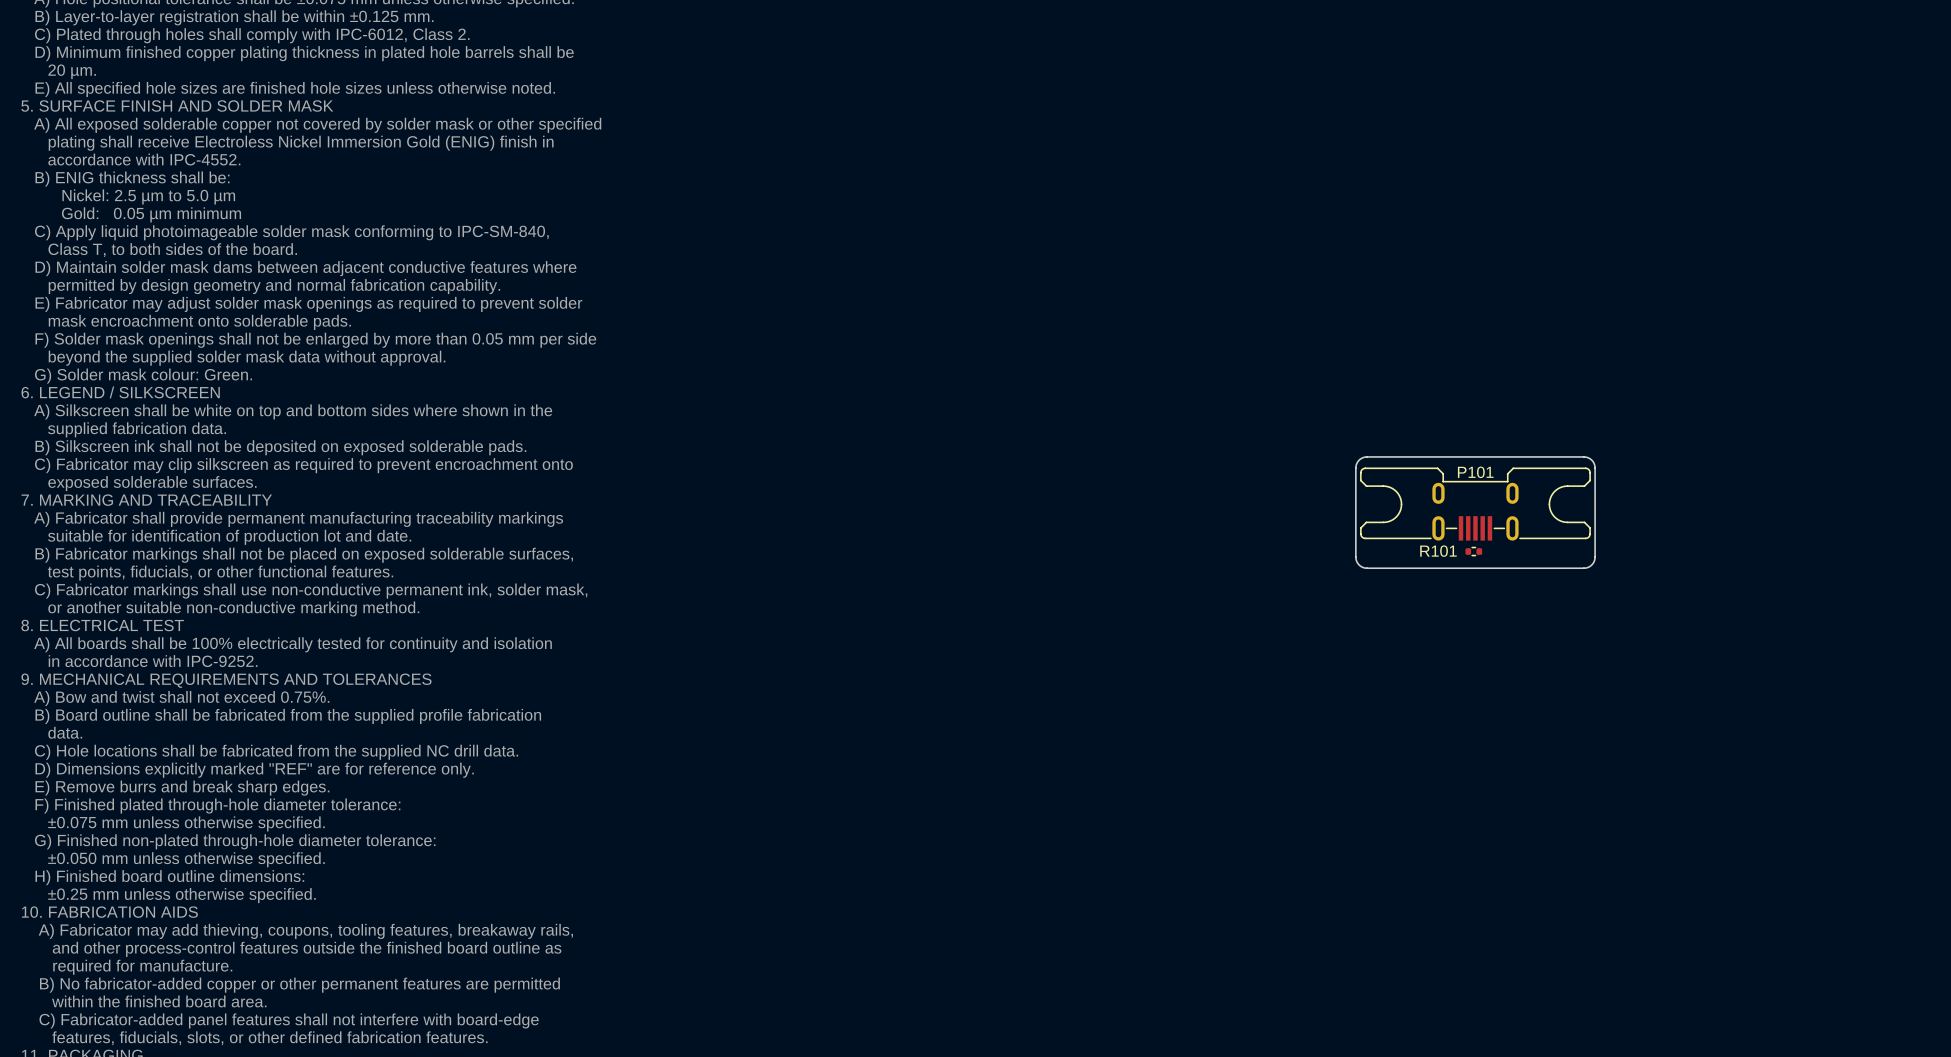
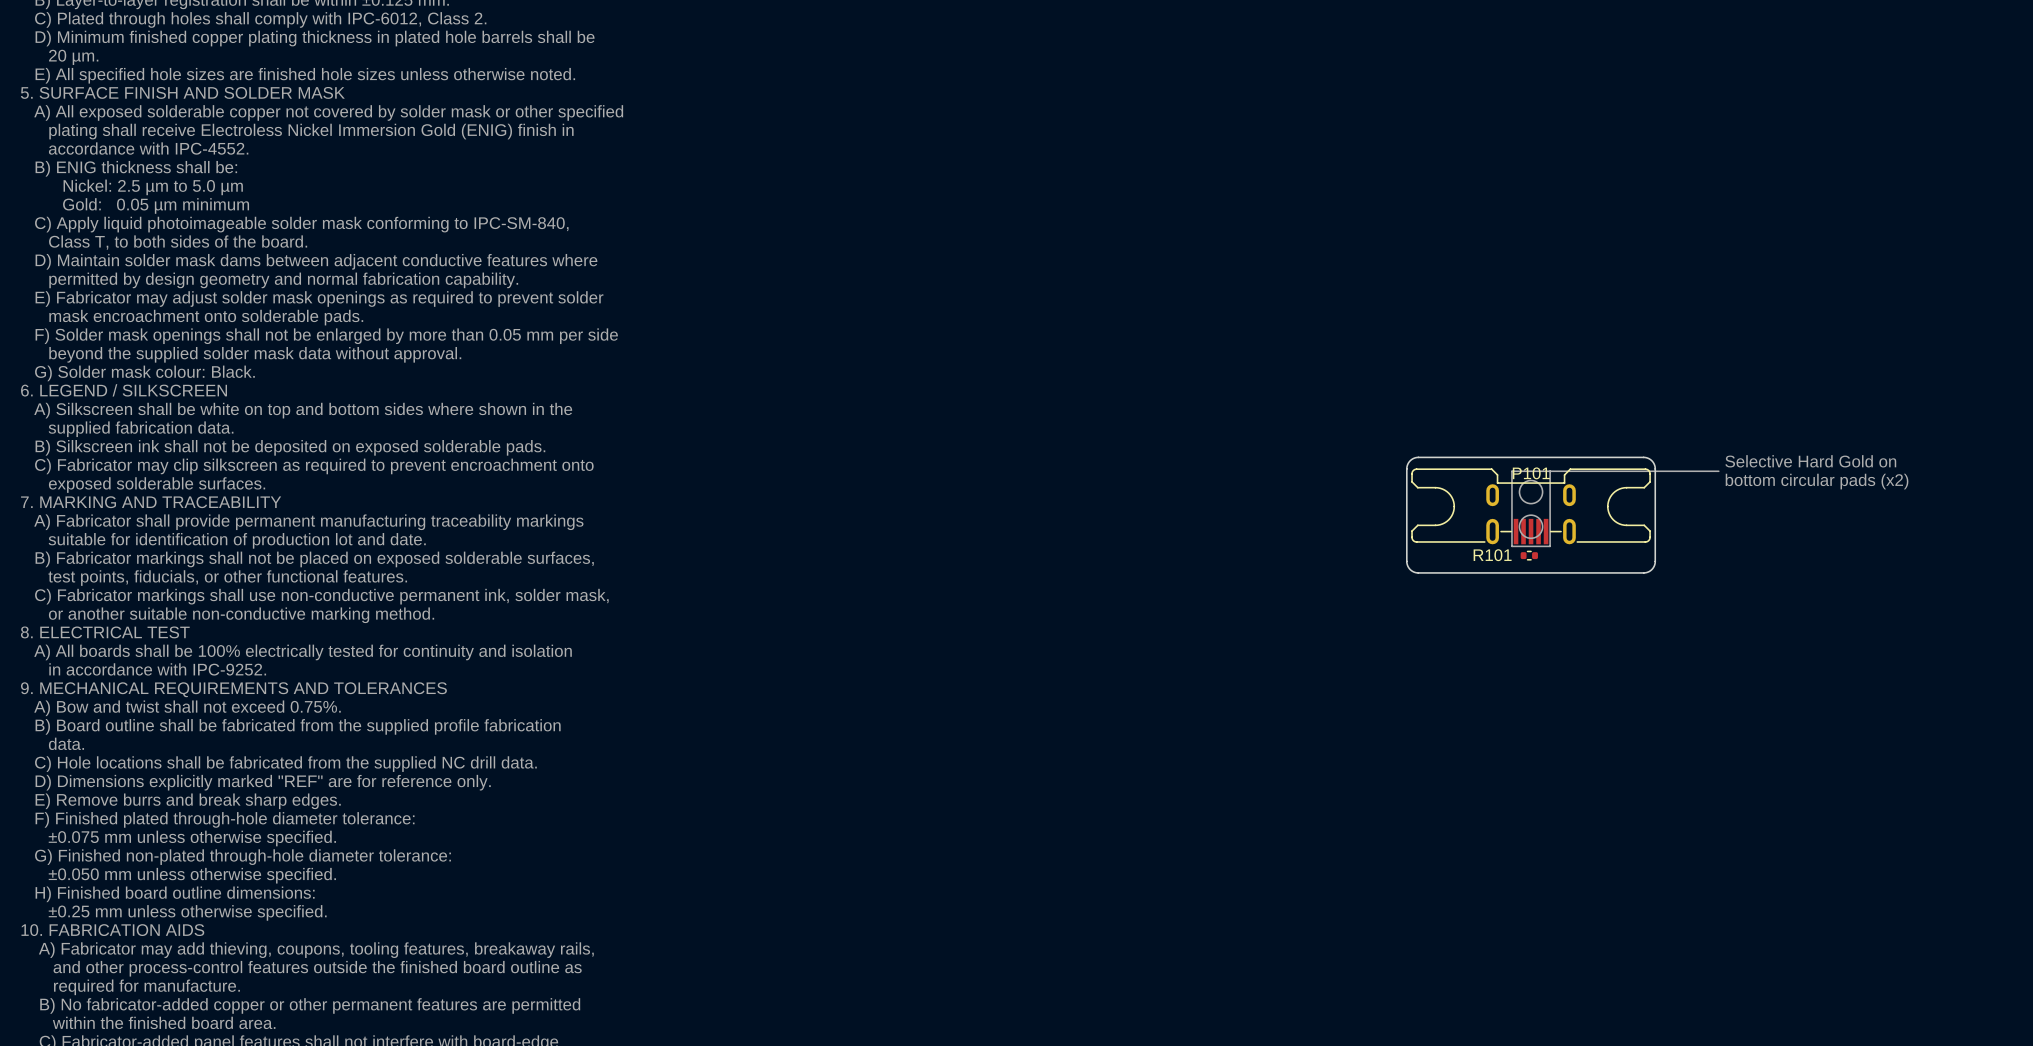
text: G) Solder mask colour: Green. (143, 376) -> G) Solder mask colour: Black. (144, 373)
text: none -> Selective Hard Gold on (1810, 461)
line: none -> (1550, 471) (1550, 546) (1511, 546) (1511, 471) (1718, 471)
drawing: none -> [1518, 479, 1544, 539]
text: none -> bottom circular pads (x2) (1817, 481)

